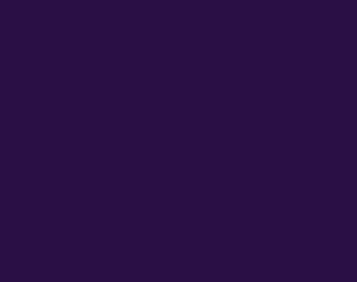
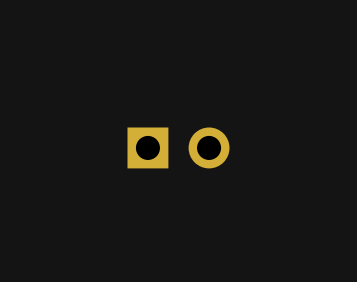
part: none -> (178, 147)

